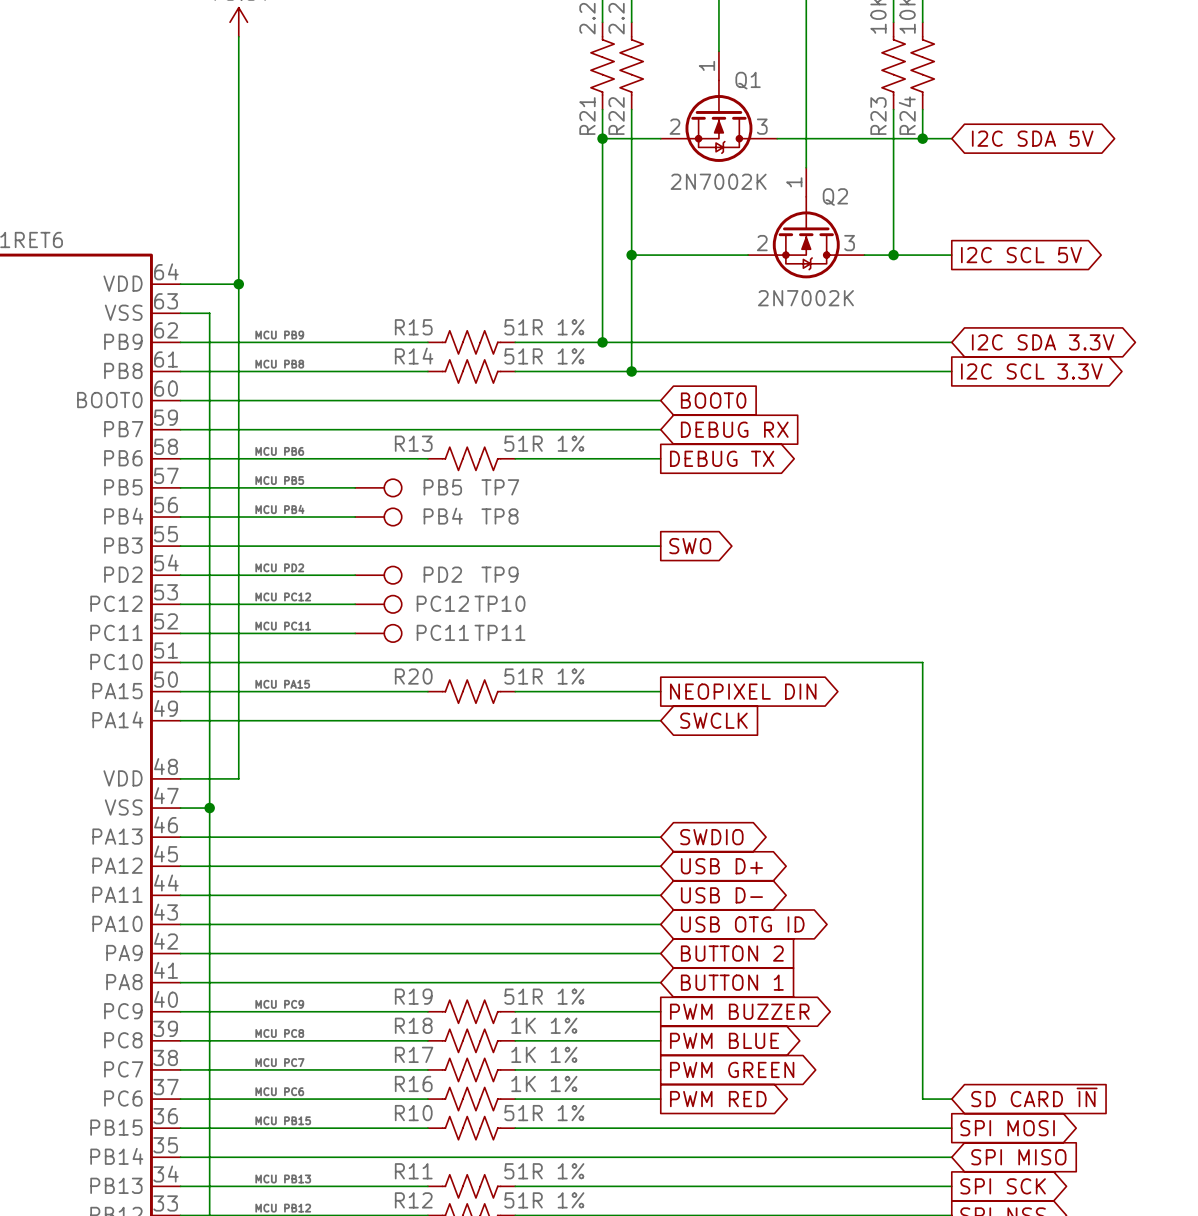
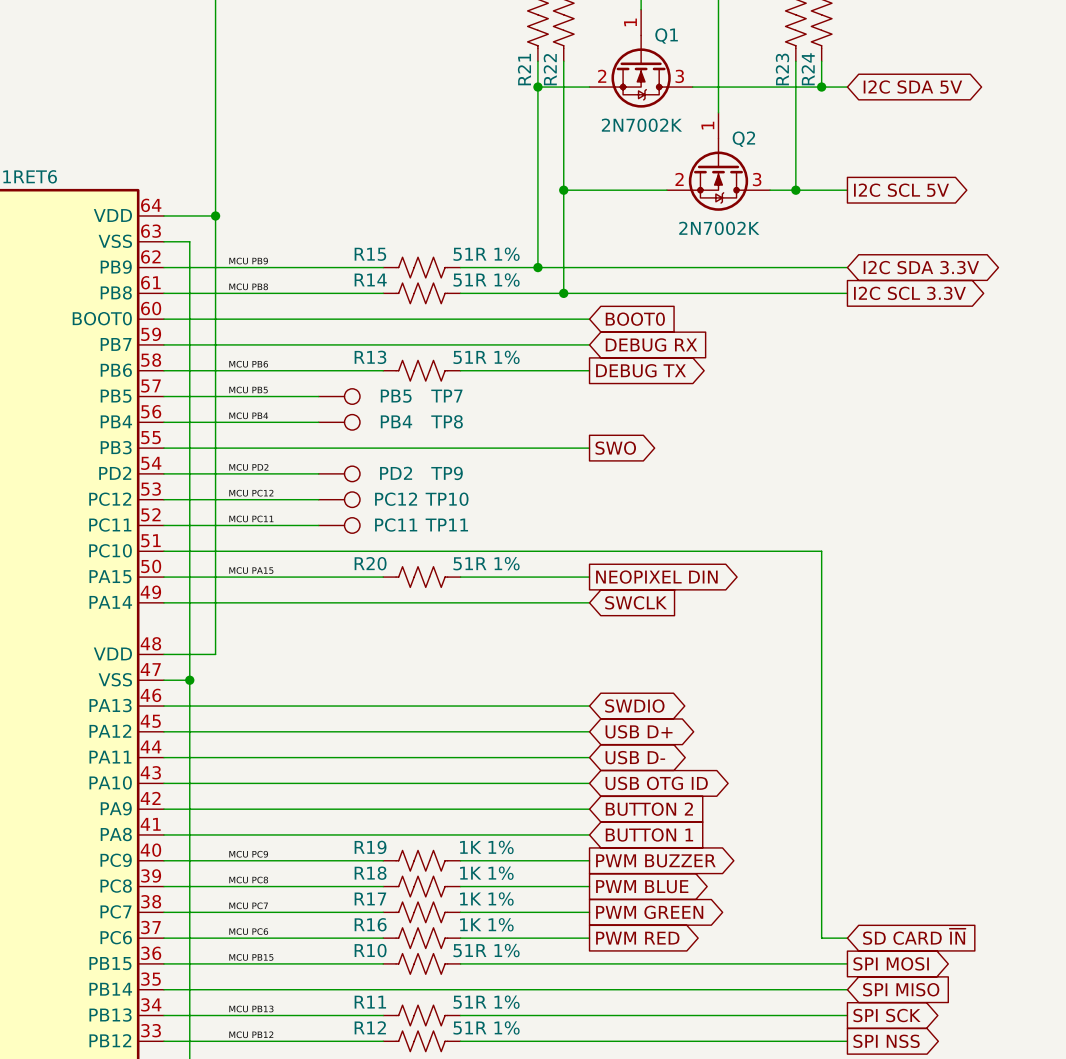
R19 value: 51R 1% (544, 996) -> 1K 1% (486, 847)

